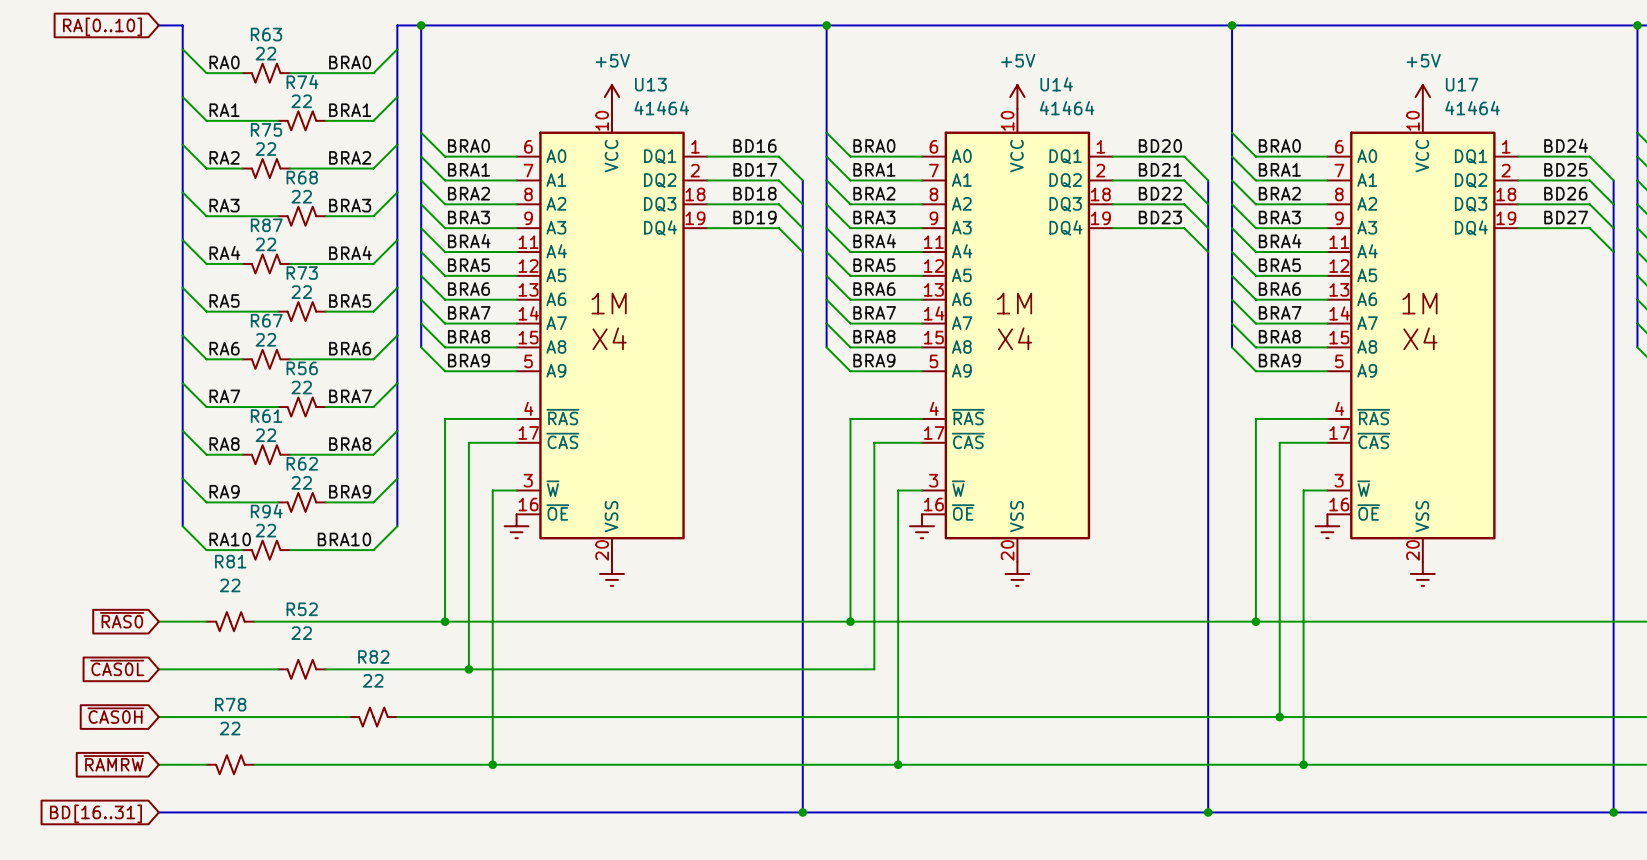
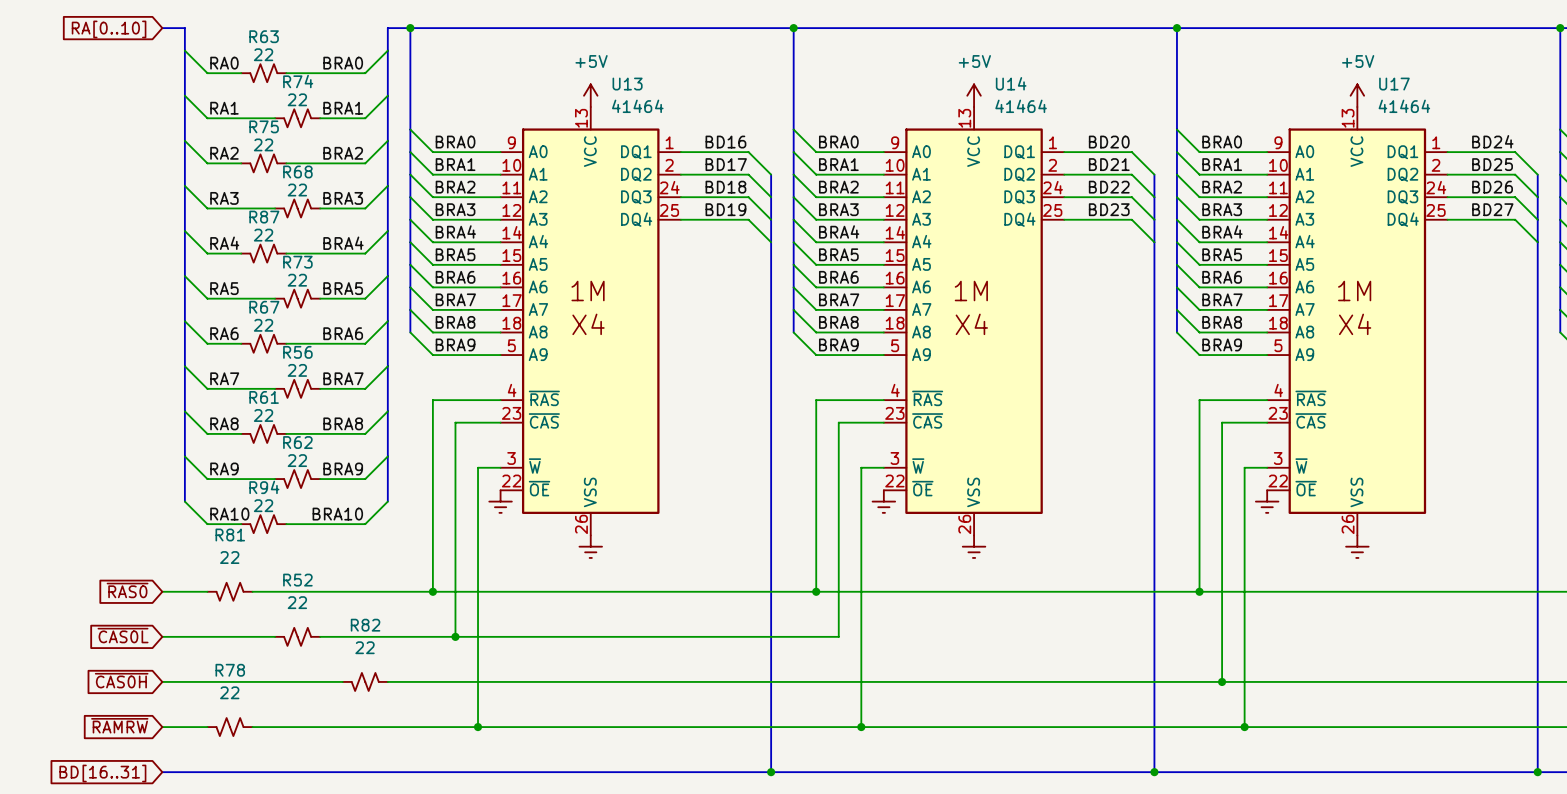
U13 symbol: [516, 108, 708, 563] -> [500, 107, 681, 536]
U14 symbol: [922, 108, 1113, 563] -> [883, 107, 1065, 536]
U17 symbol: [1327, 108, 1519, 563] -> [1267, 107, 1448, 536]

